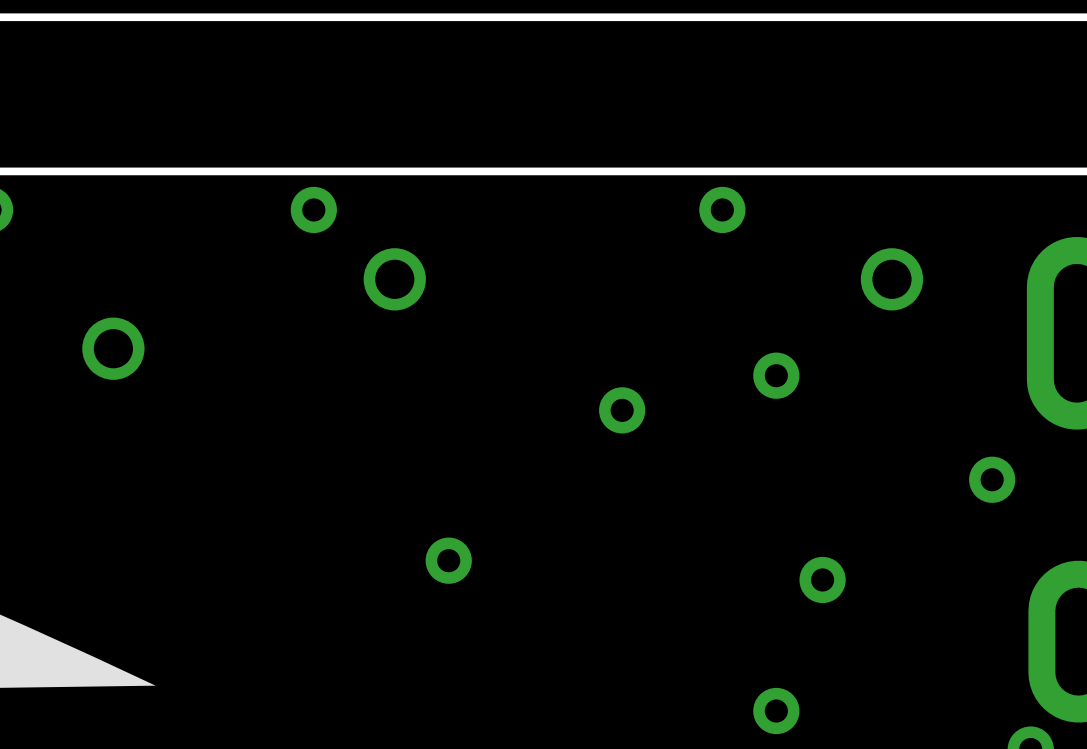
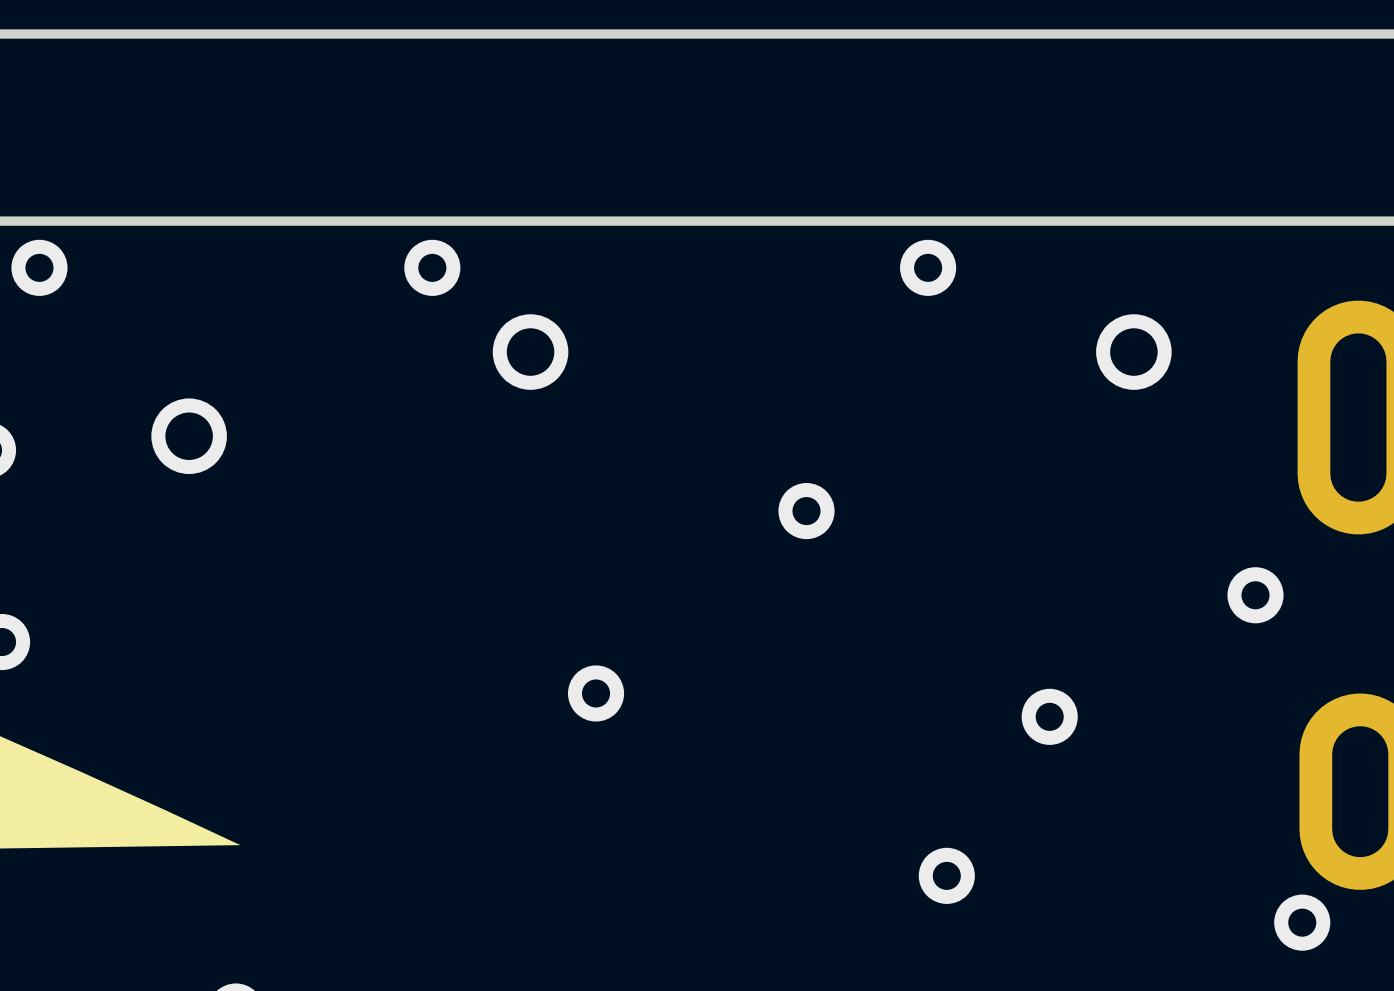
via: (776, 375) -> none
via position: (776, 711) -> (946, 875)

